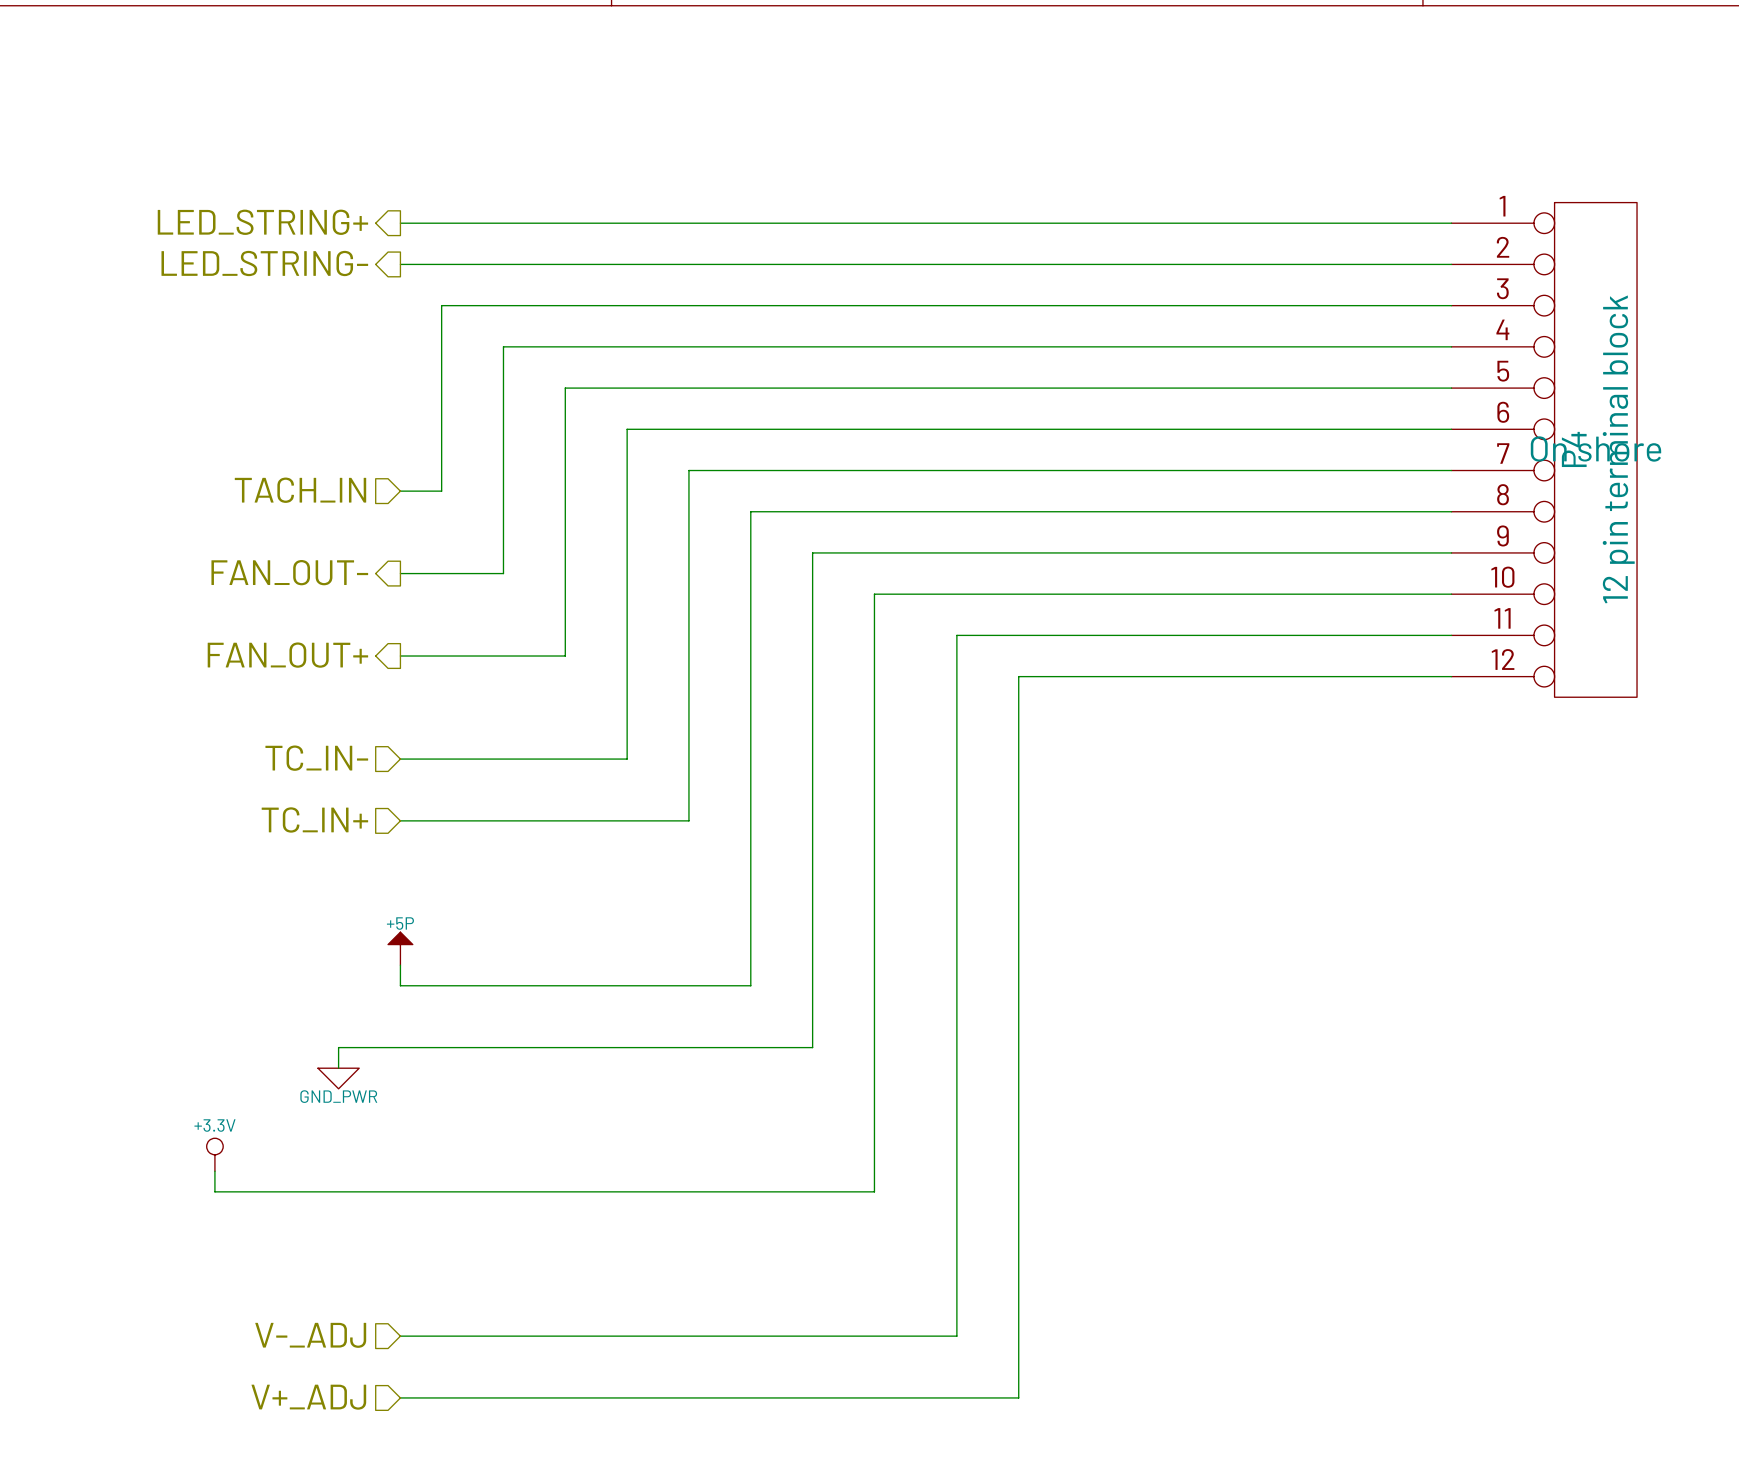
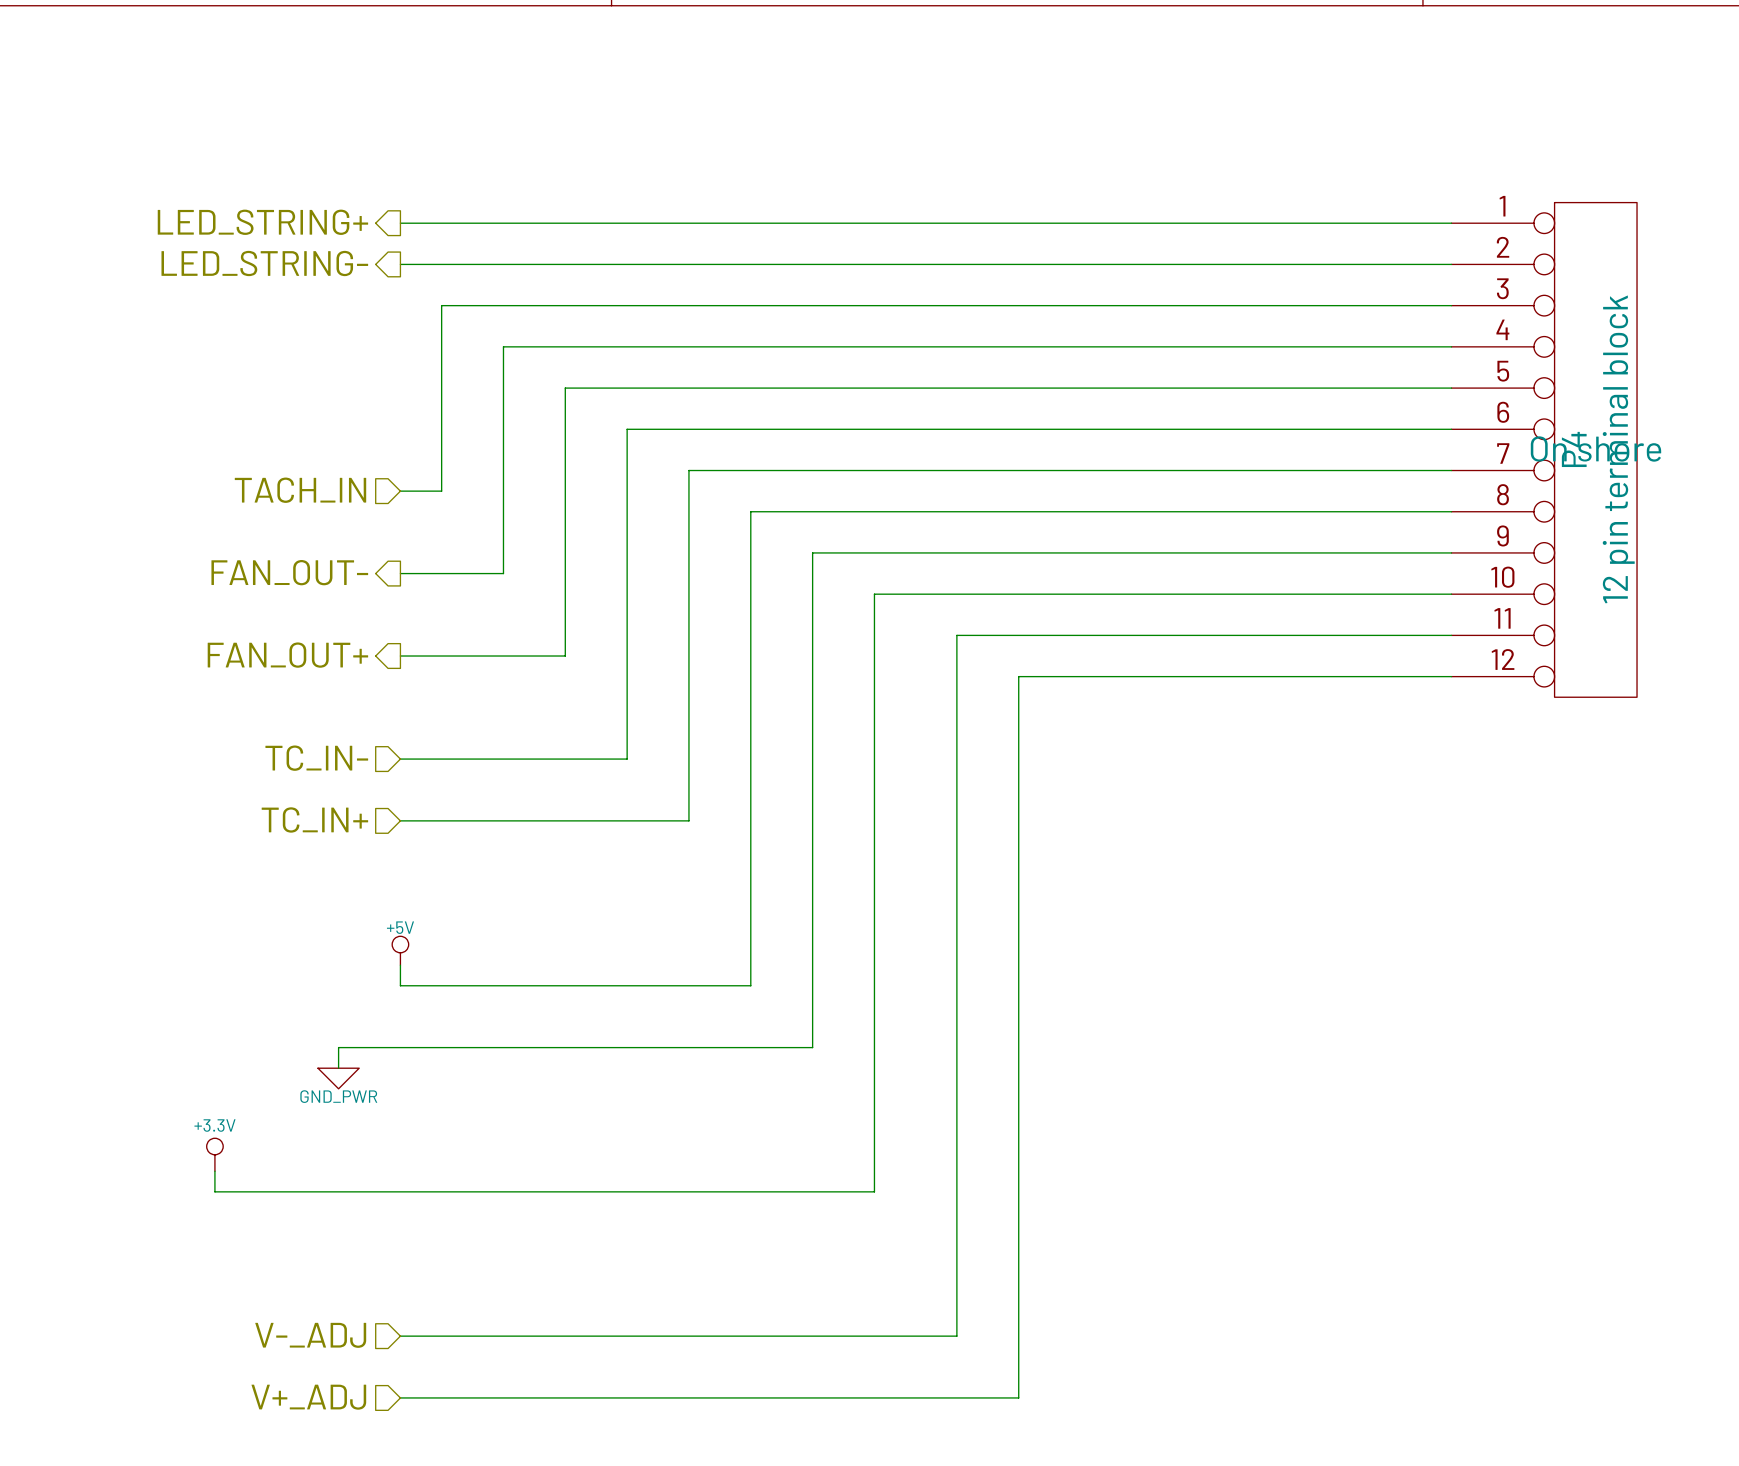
power symbol: +5P (400, 948) -> +5V (400, 950)

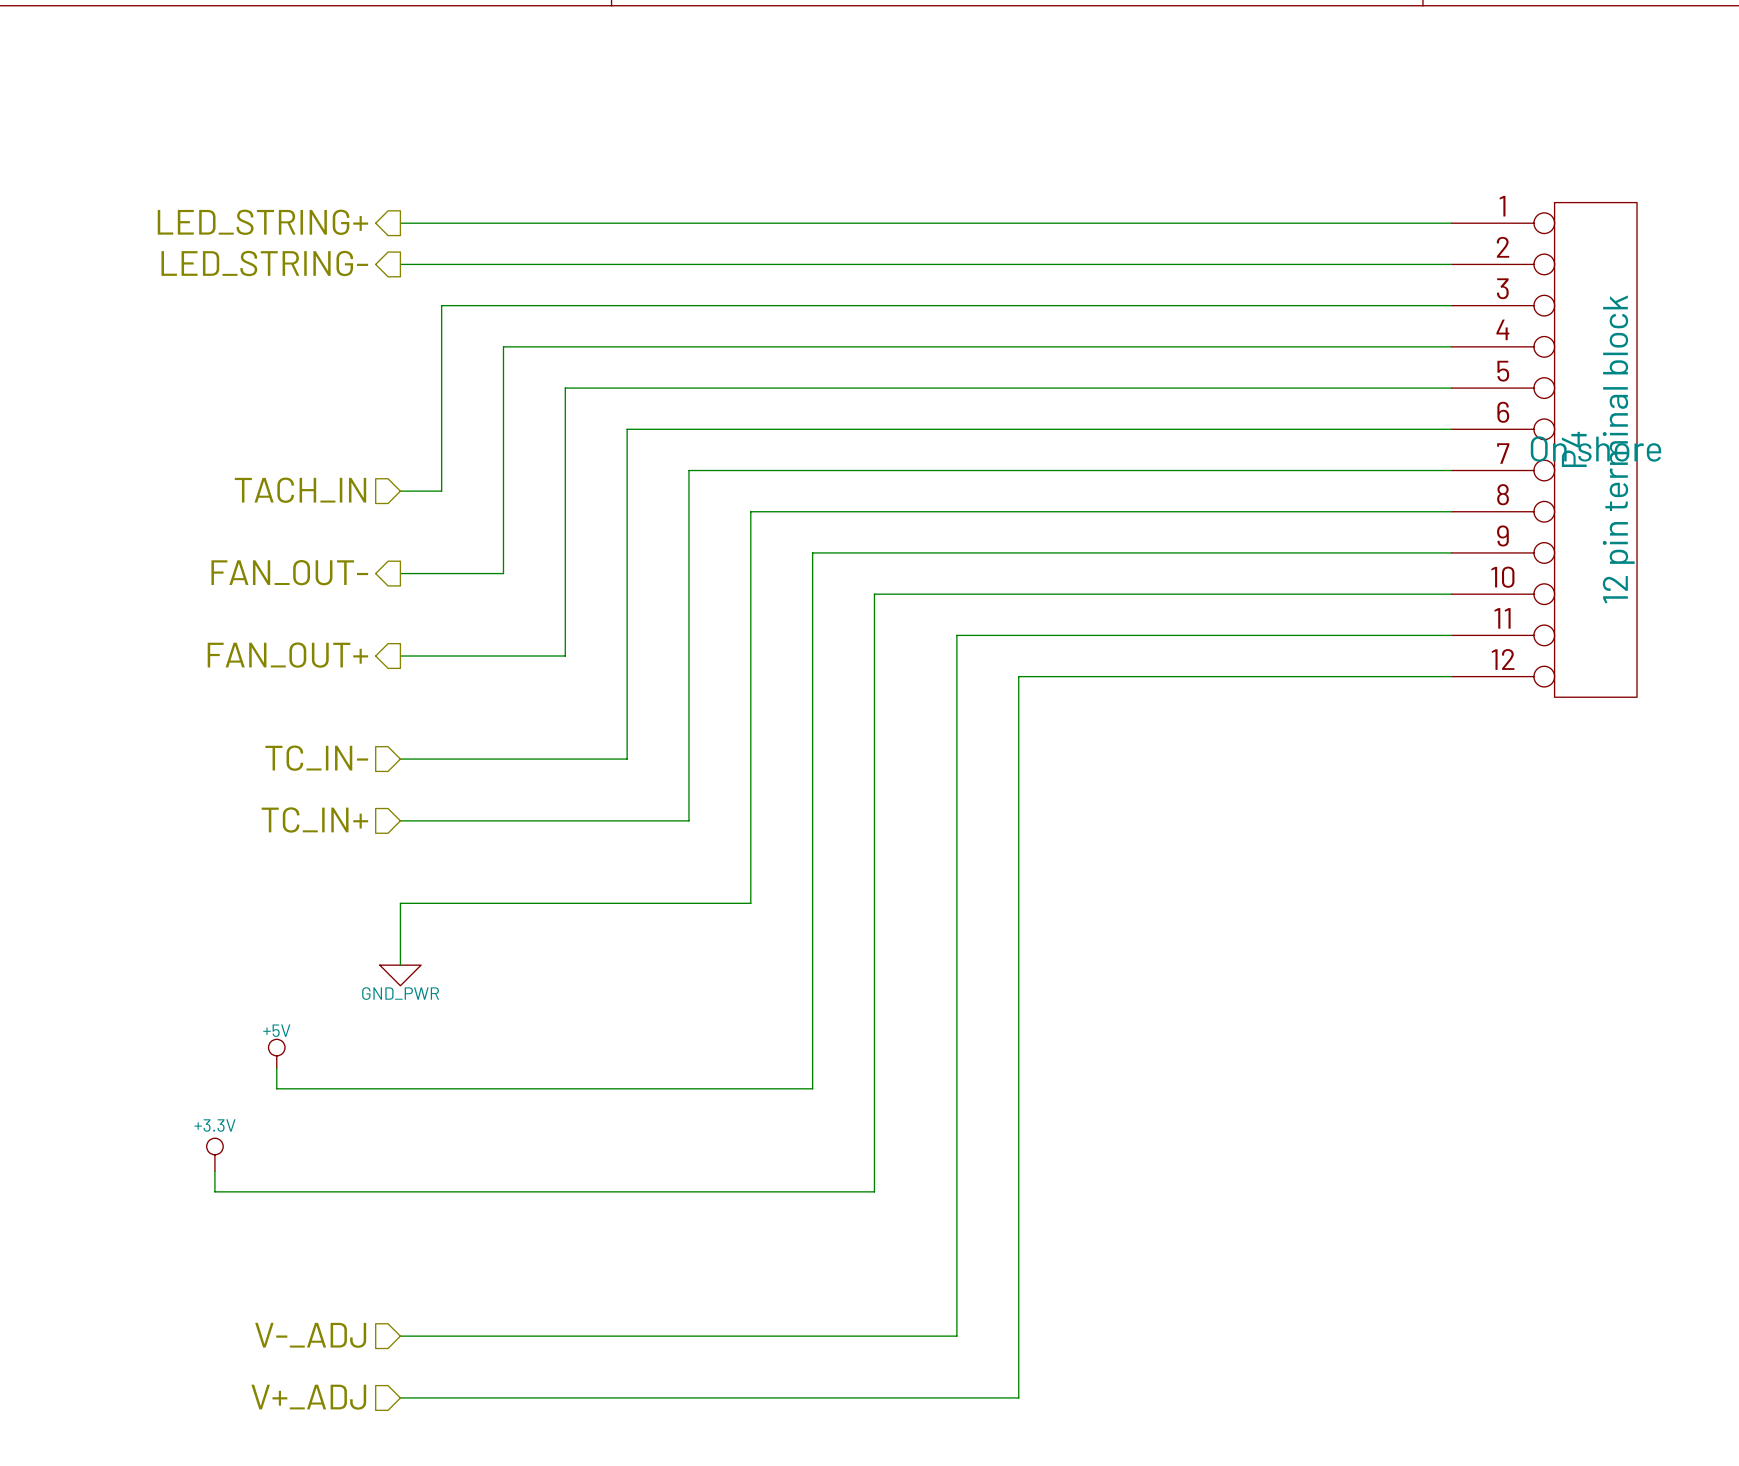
wire: (750, 903) (750, 985) (400, 985) (400, 965) -> (750, 903) (400, 903) (400, 965)
power symbol position: +5V (400, 950) -> +5V (276, 1053)
wire: (812, 1047) (338, 1047) (338, 1068) -> (812, 1047) (812, 1088) (276, 1088) (276, 1068)
power symbol position: GND_PWR (338, 1078) -> GND_PWR (400, 975)

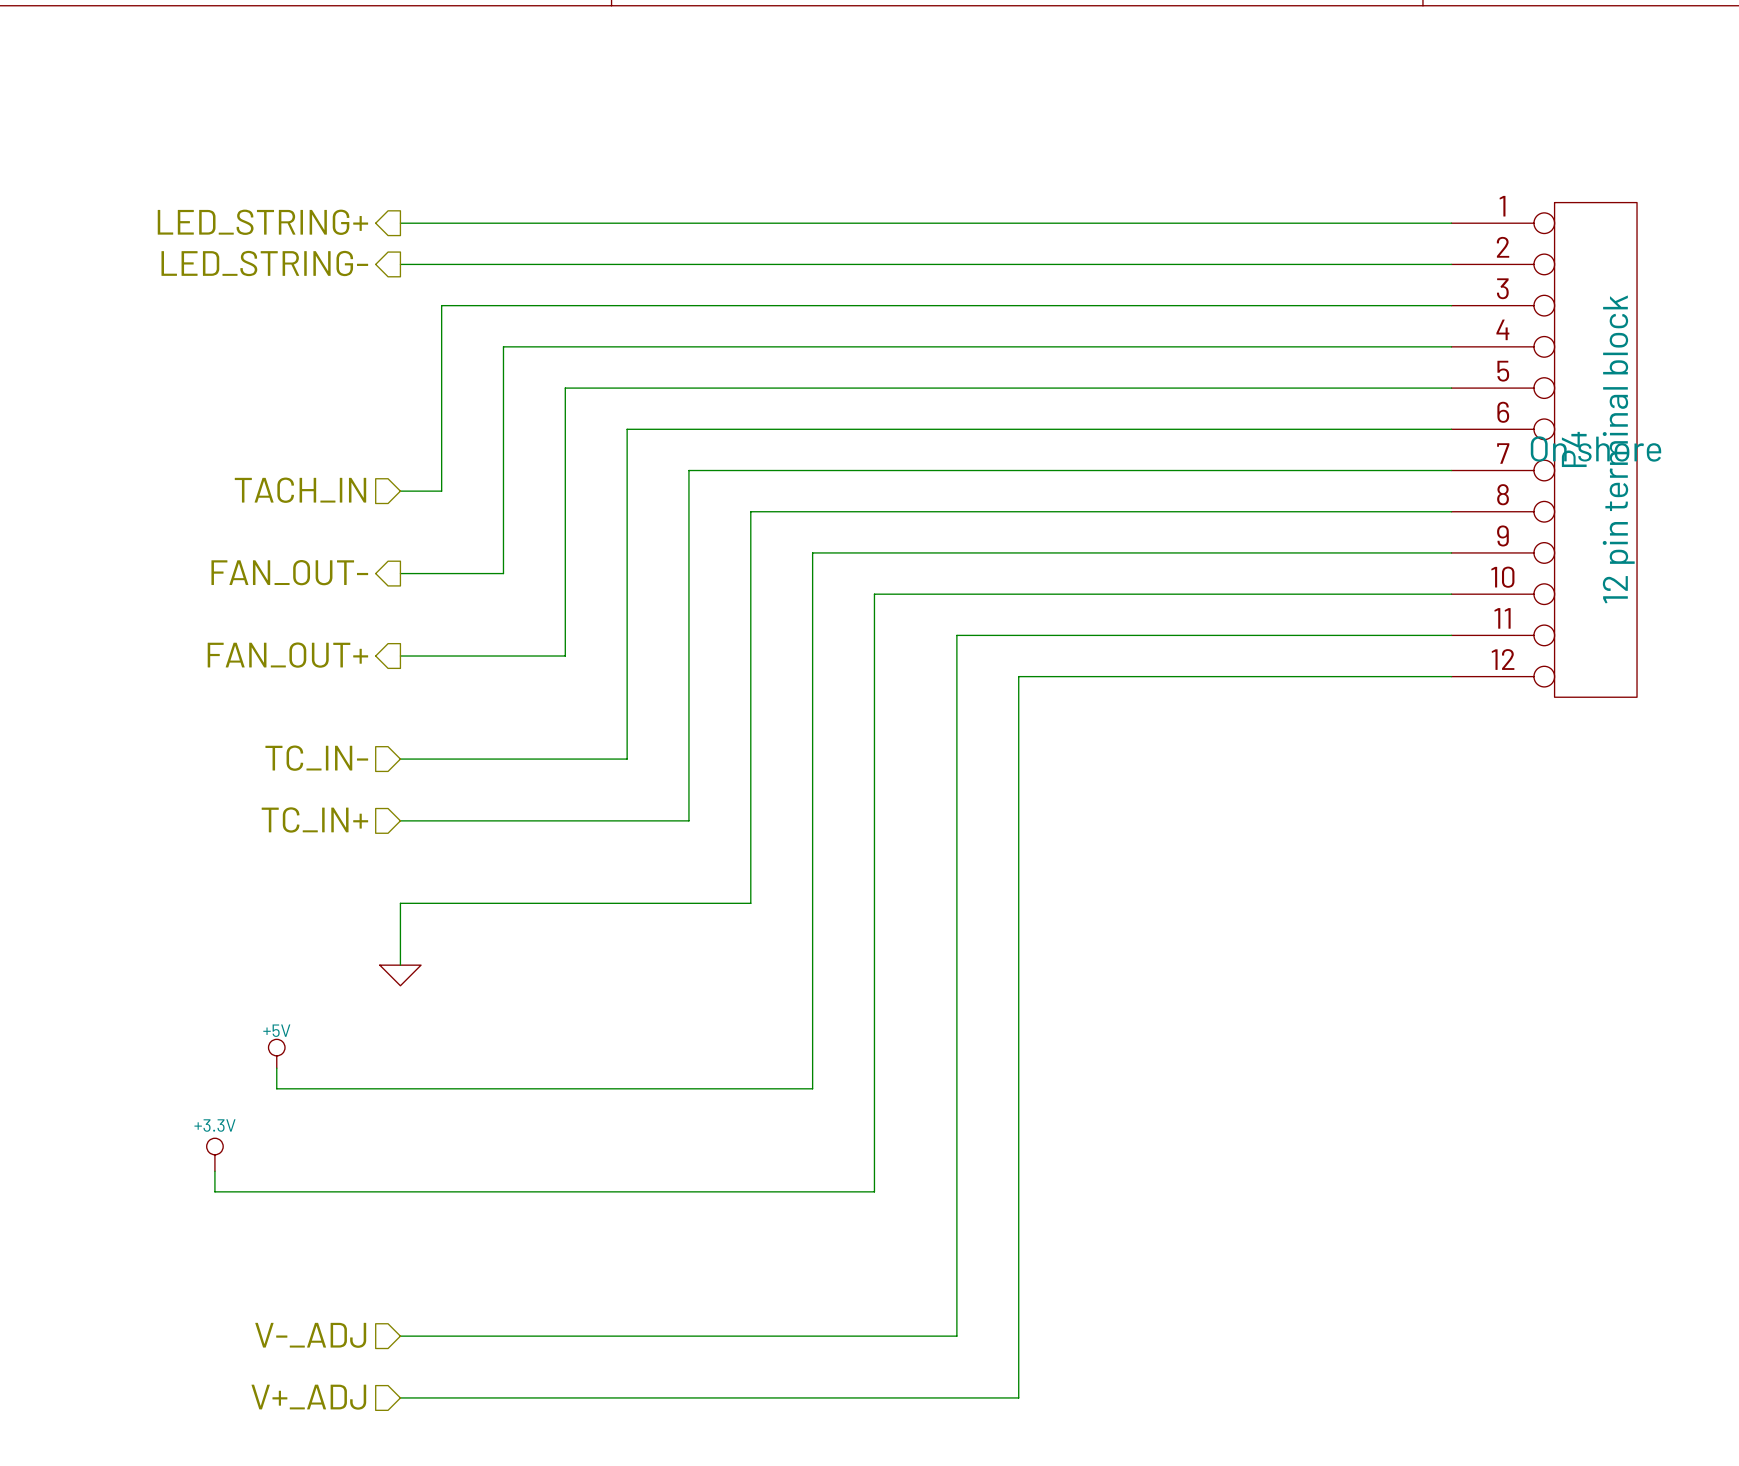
power symbol text: GND_PWR (400, 993) -> none

